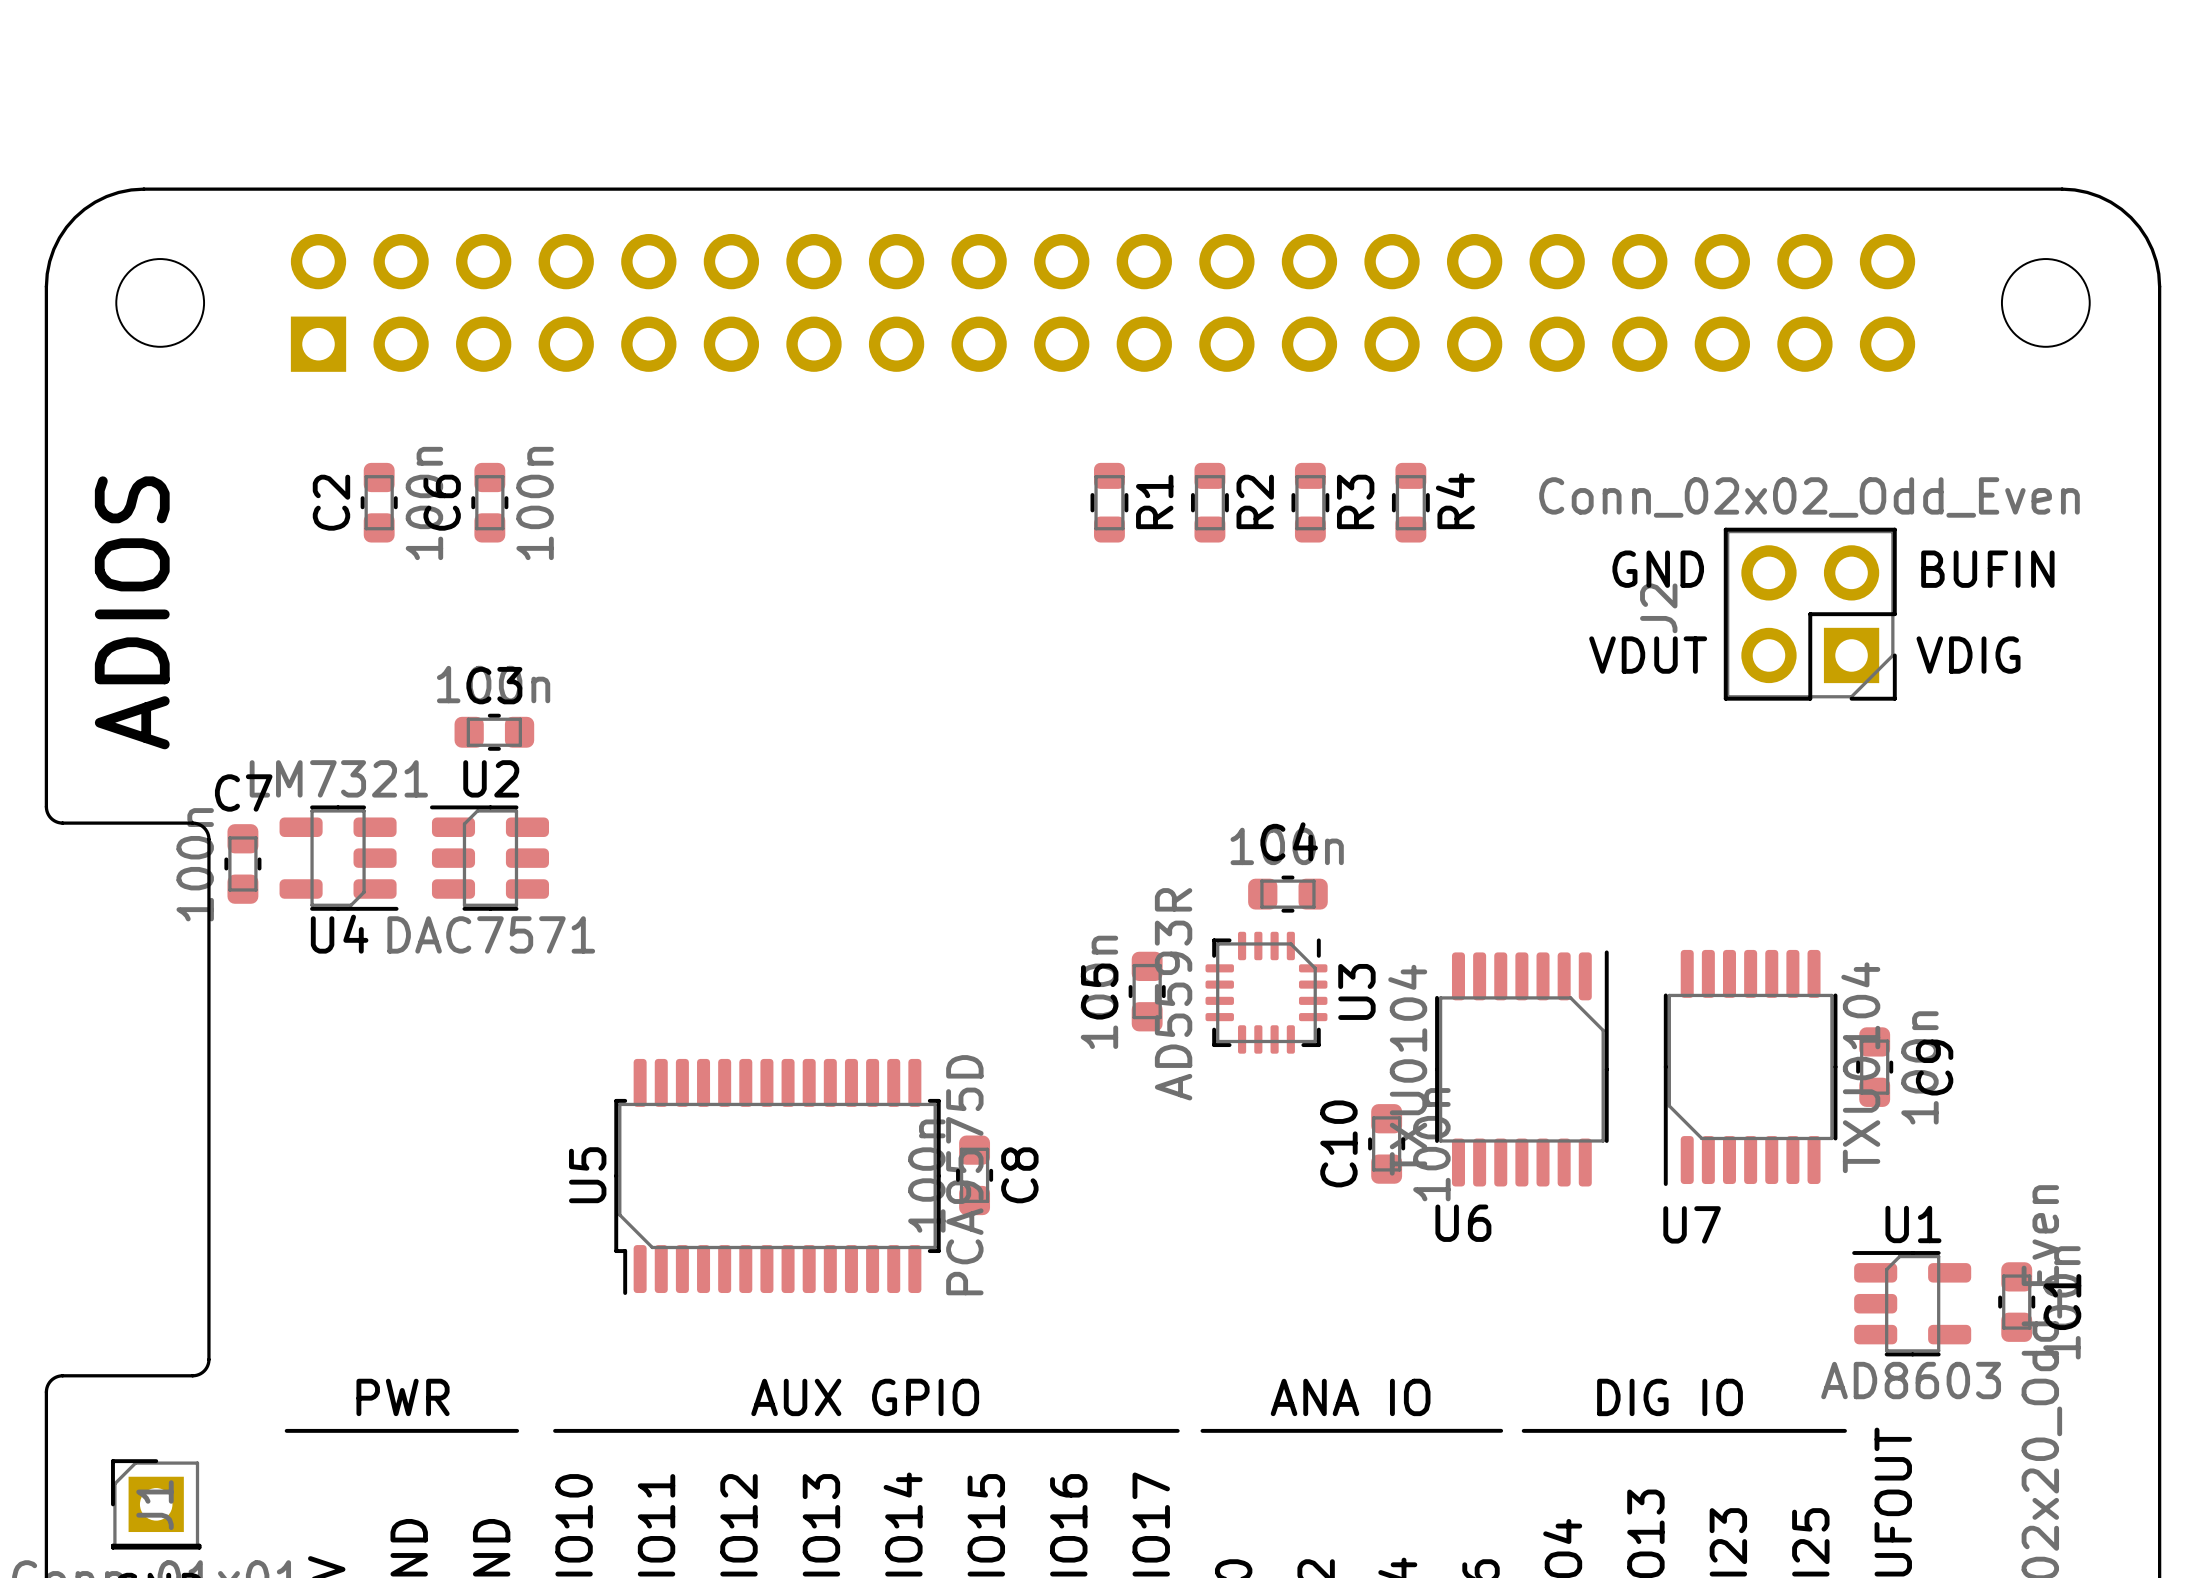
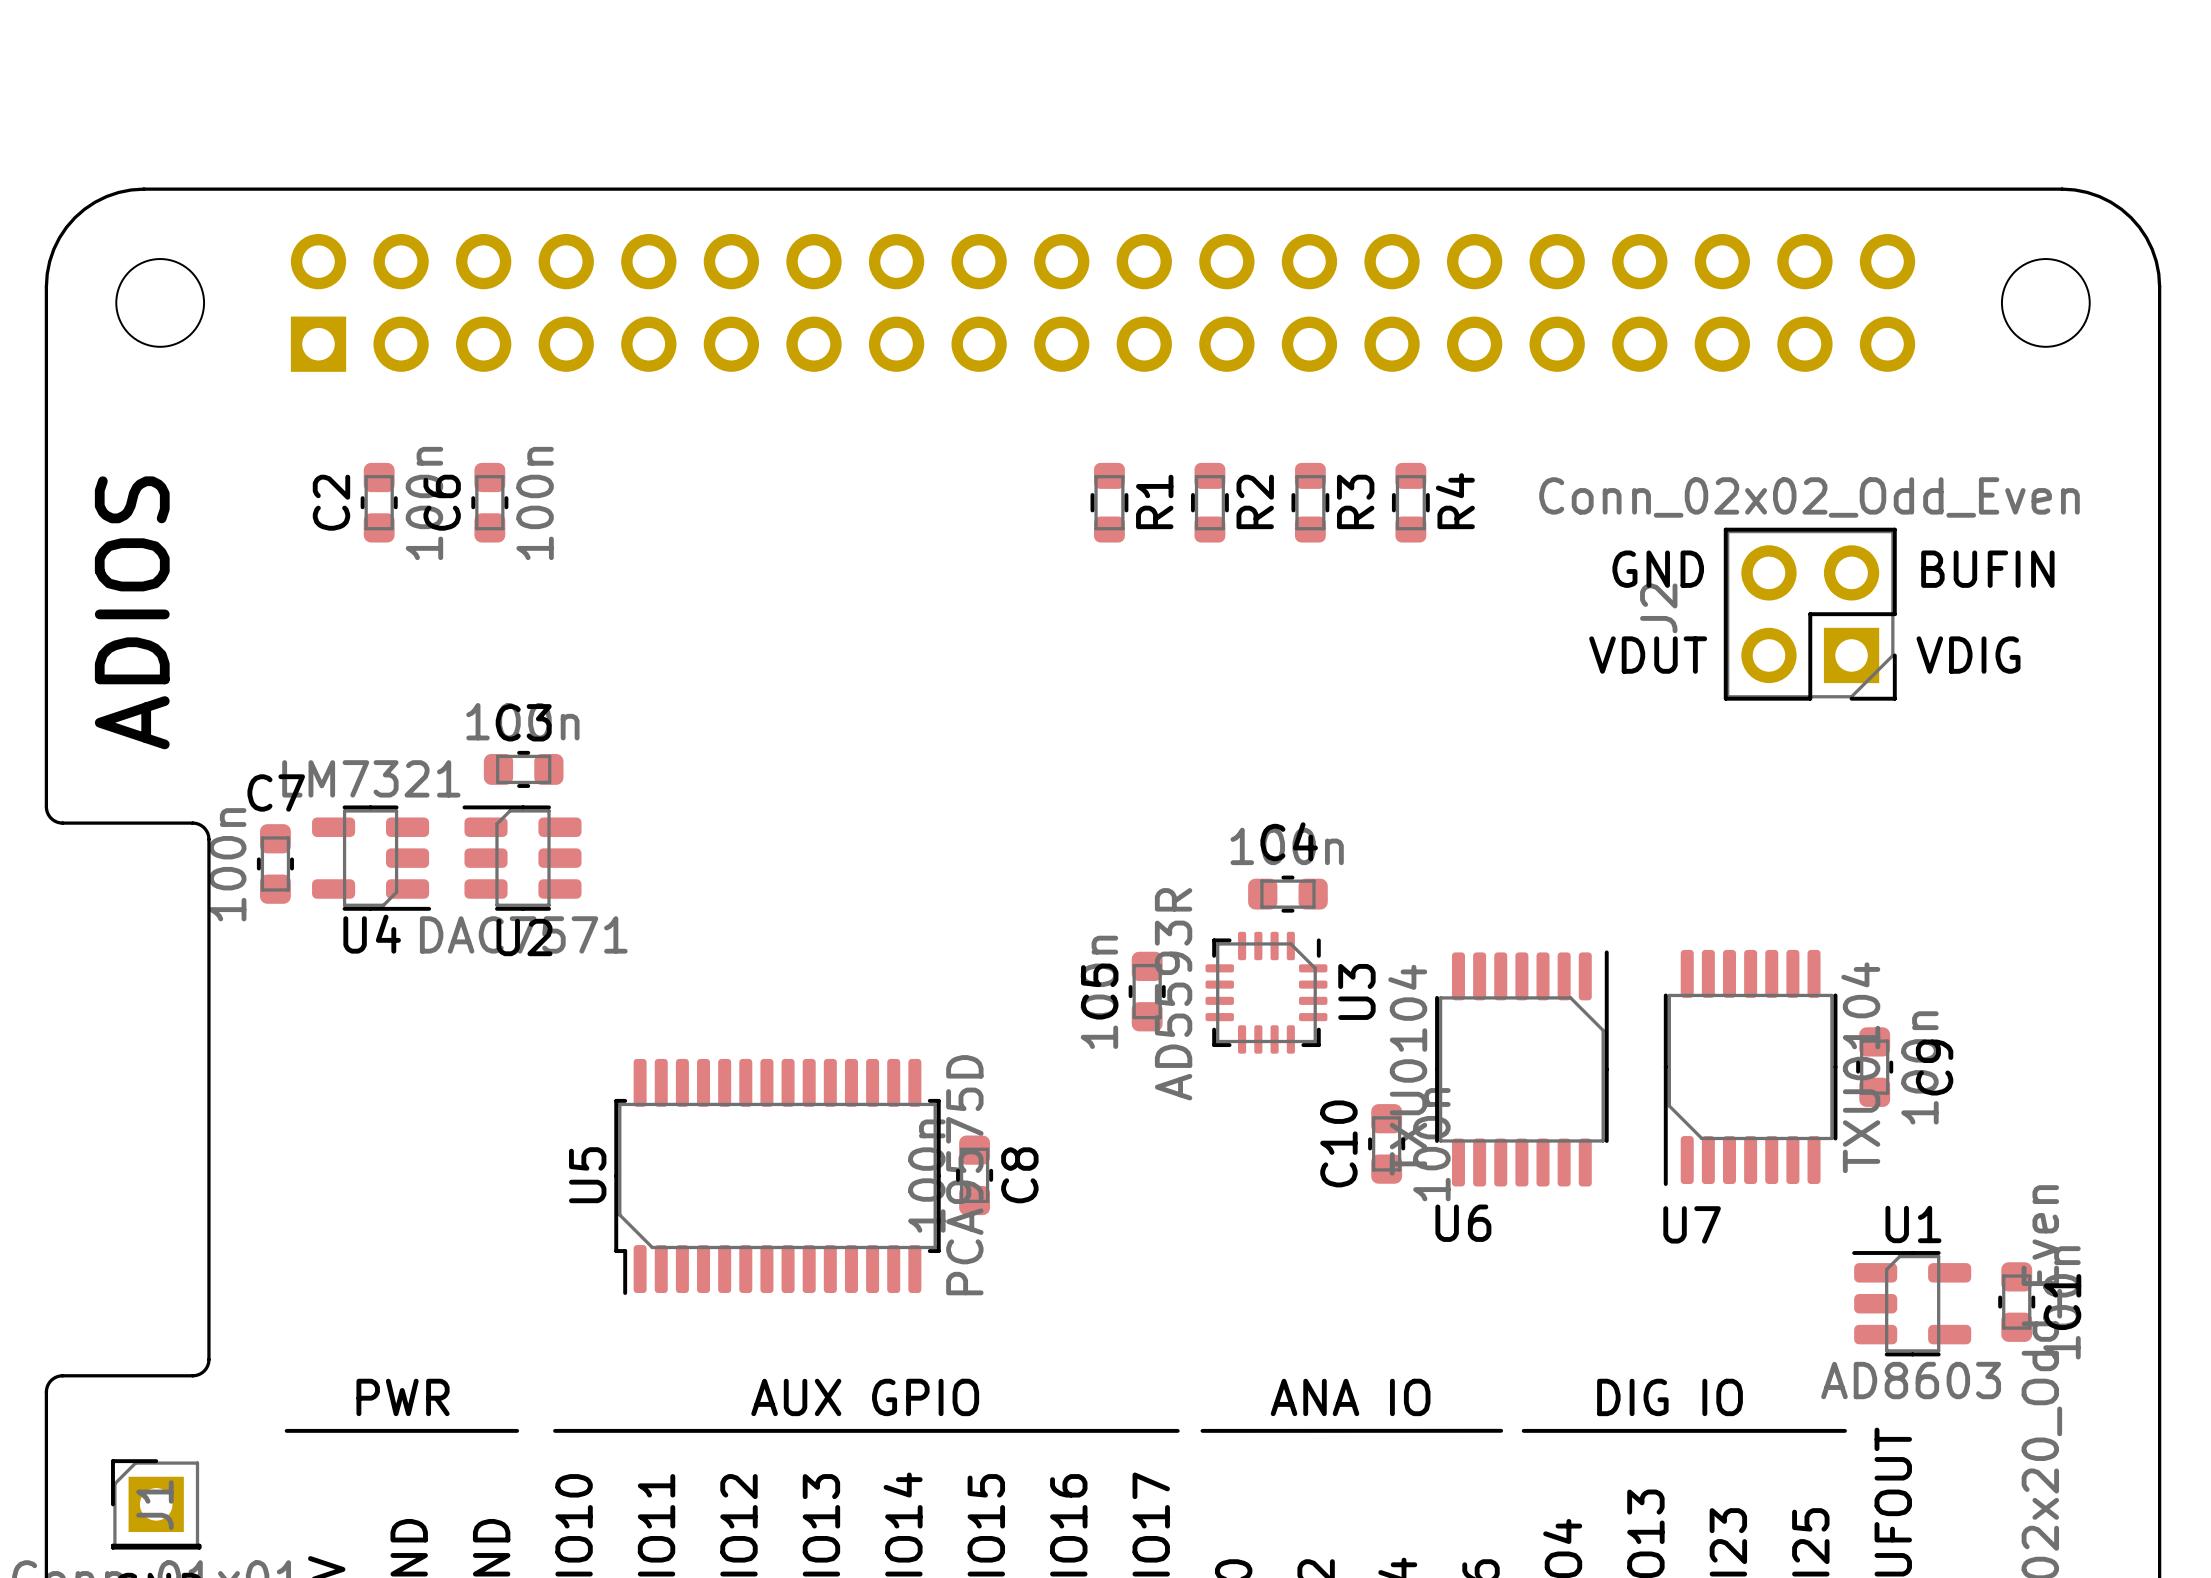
C3 position: (494, 732) -> (523, 769)
U2 name position: U2 (491, 778) -> U2 (524, 937)
U4 position: (339, 858) -> (371, 858)
U2 position: (489, 858) -> (522, 858)
C7 position: (242, 863) -> (275, 863)

